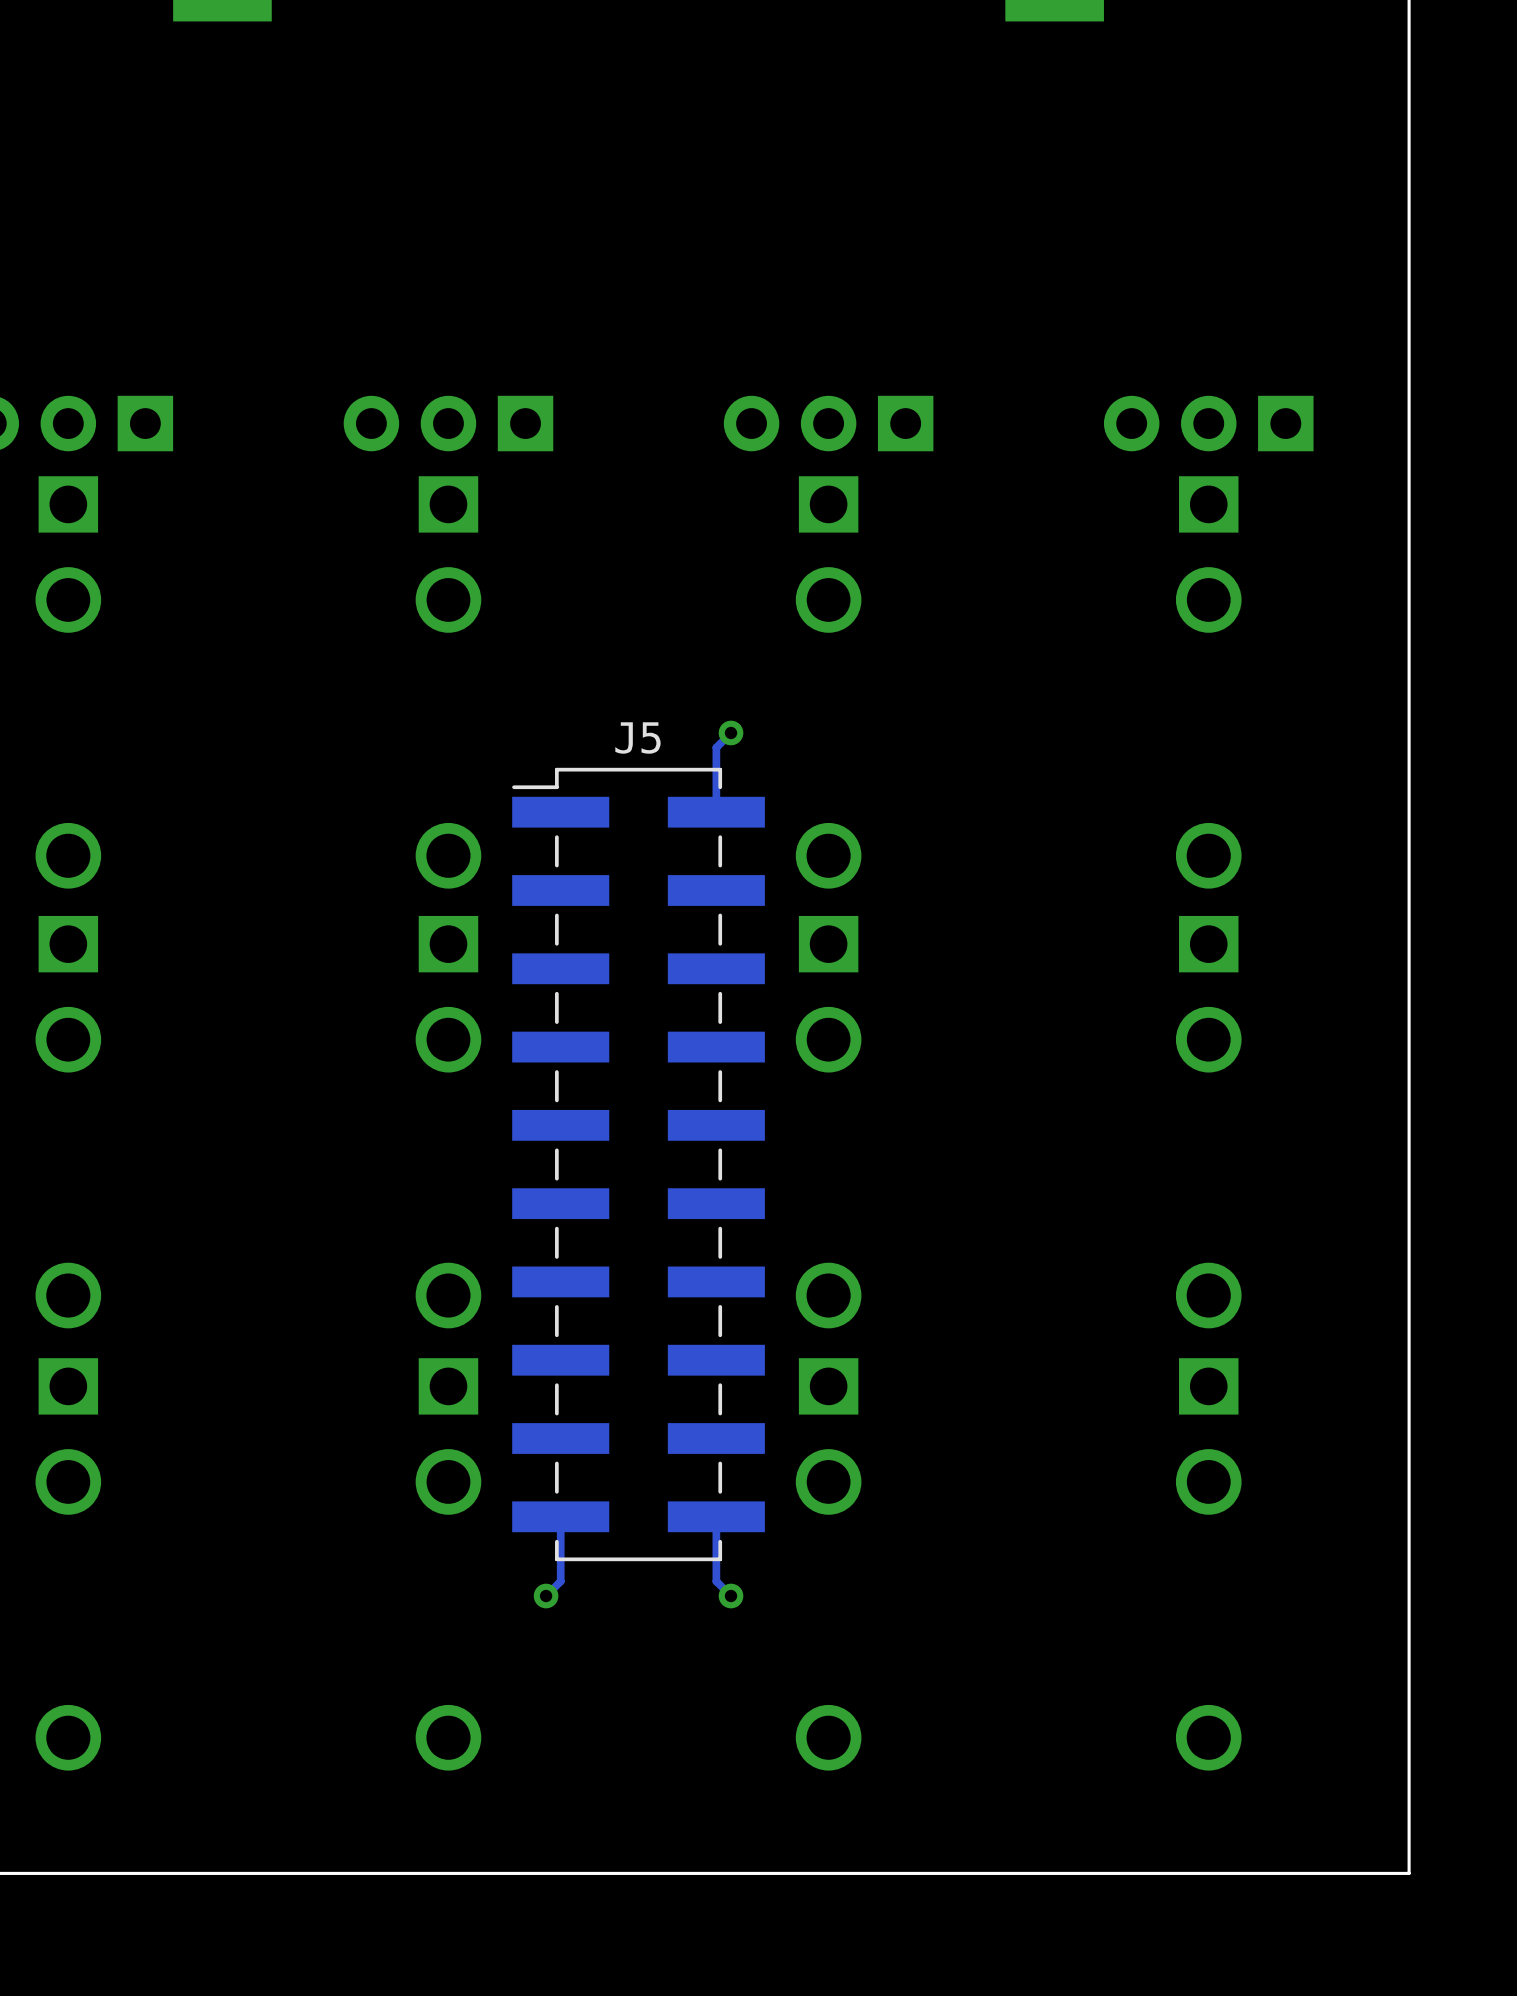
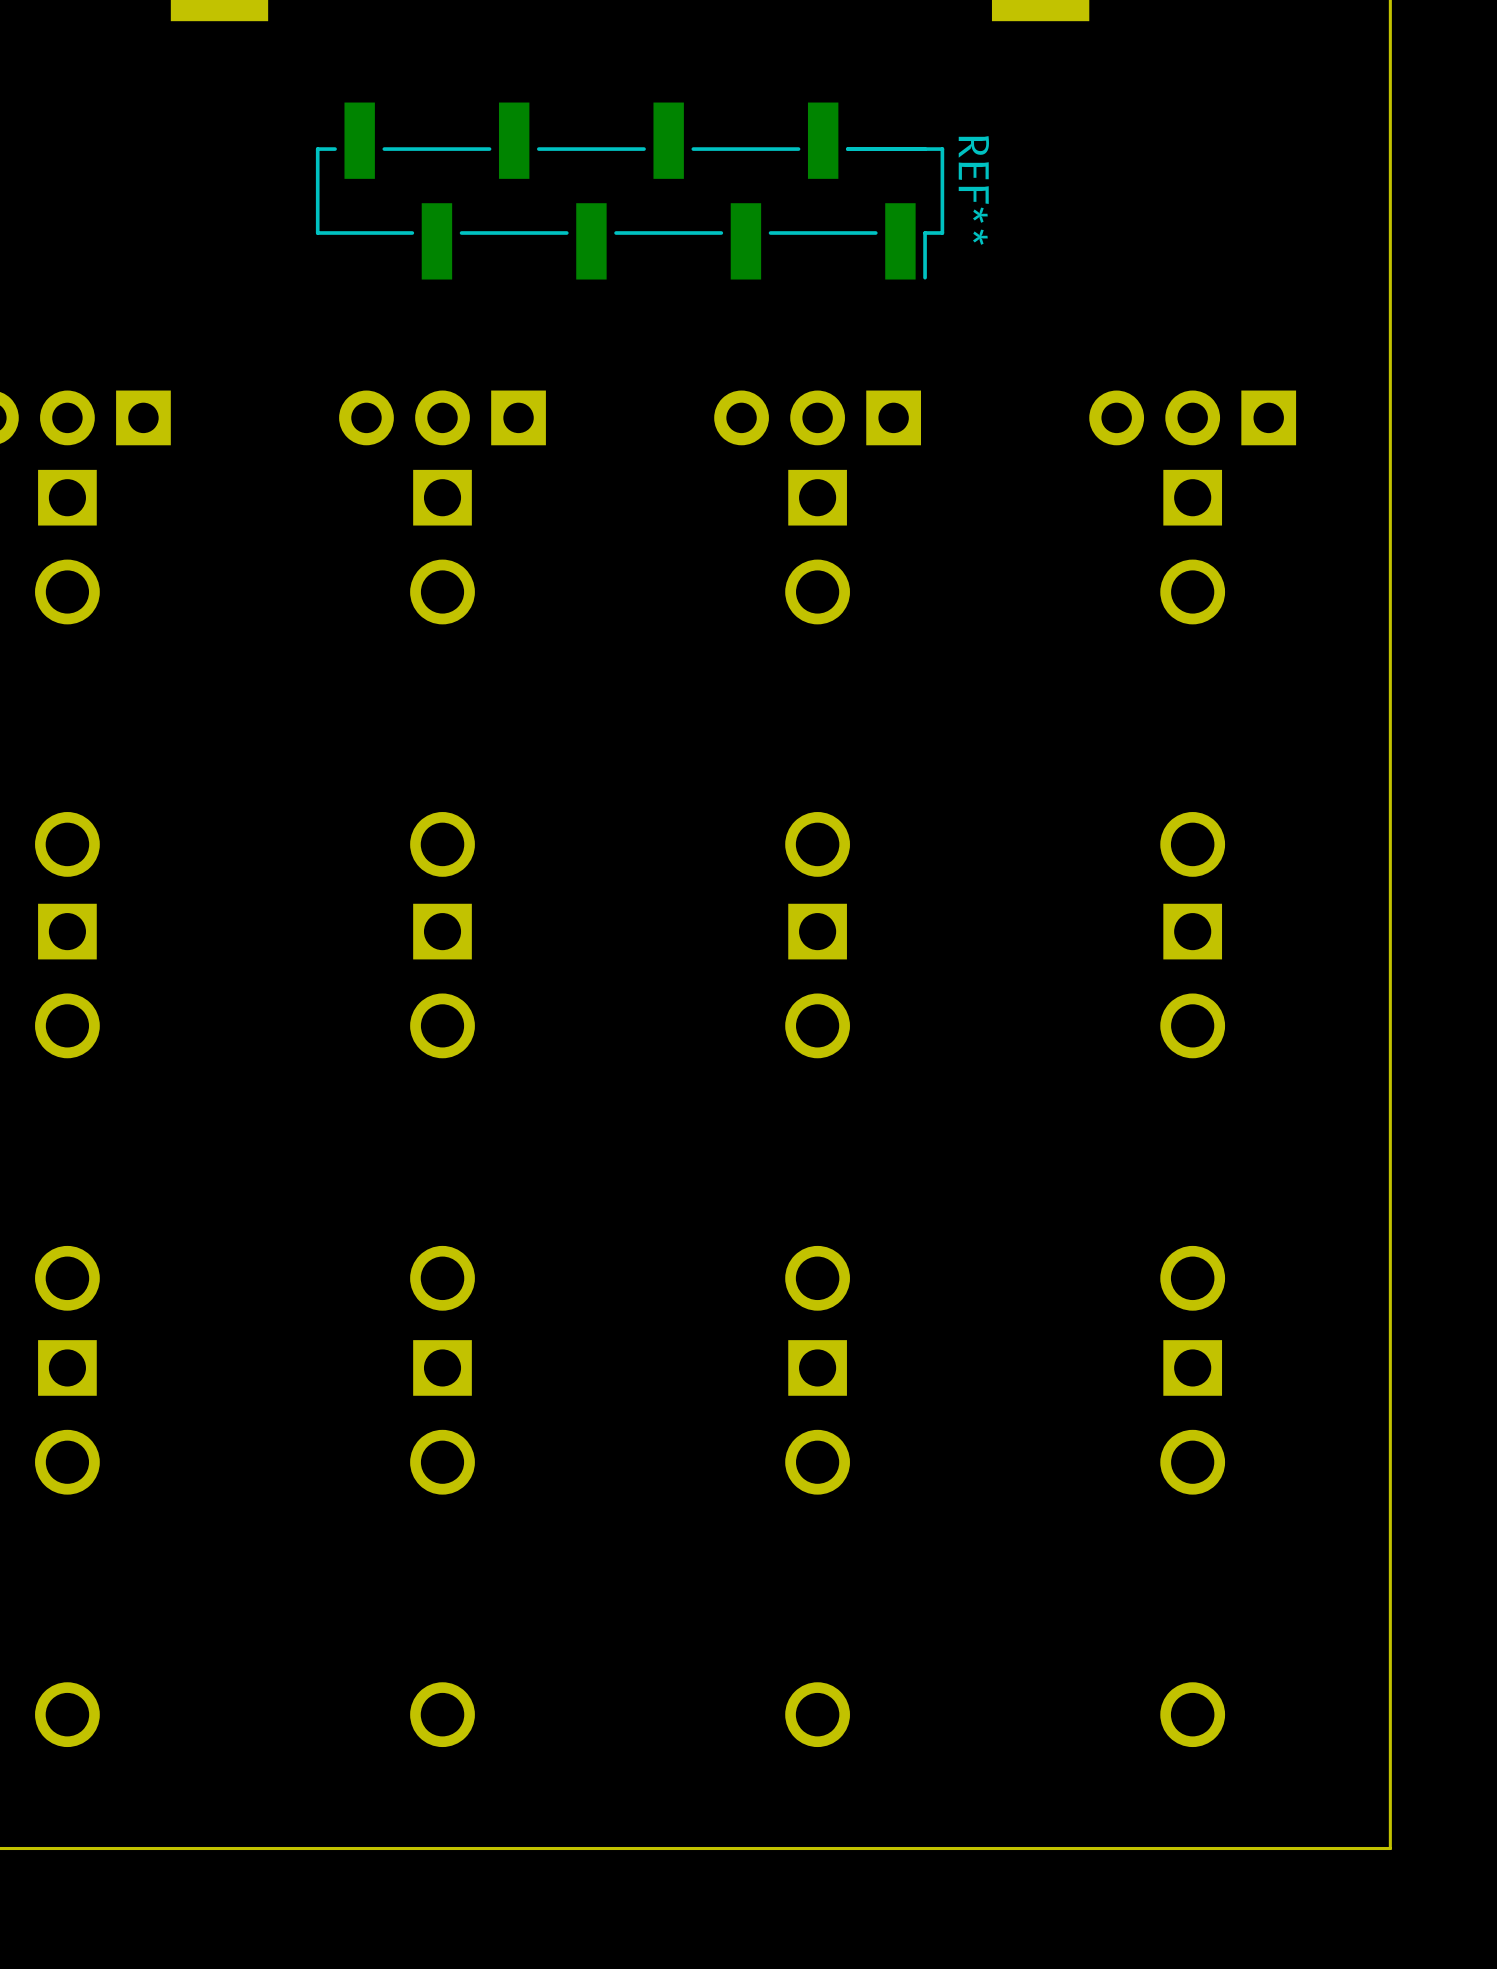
REF**: none -> (630, 191)
track: (731, 732) (716, 747) (716, 812) -> none
via: (731, 732) -> none
J5: (638, 1164) -> none
track: (560, 1516) (560, 1581) (546, 1596) -> none
track: (716, 1516) (716, 1581) (731, 1596) -> none
via: (546, 1596) -> none
via: (731, 1596) -> none

